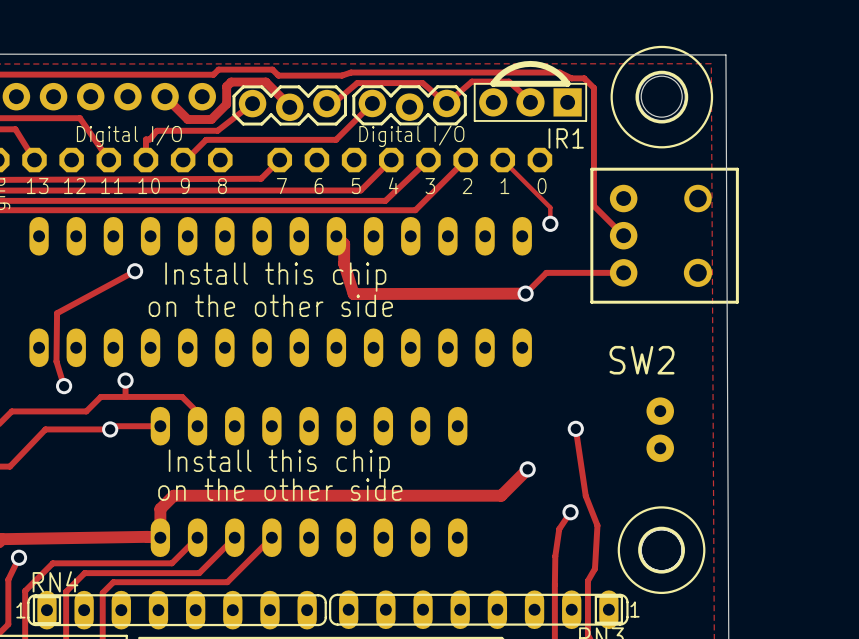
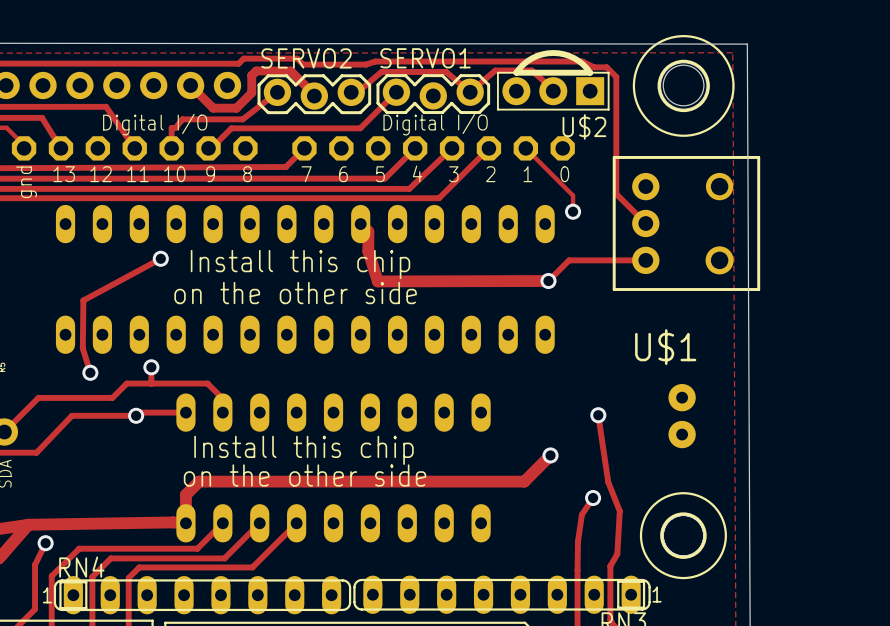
SERVO2 name: none -> SERVO2 (306, 58)
SERVO1 name: none -> SERVO1 (425, 58)
IR1 name: IR1 (566, 138) -> U$2 (584, 126)
SW2 name: SW2 (642, 360) -> U$1 (665, 347)

